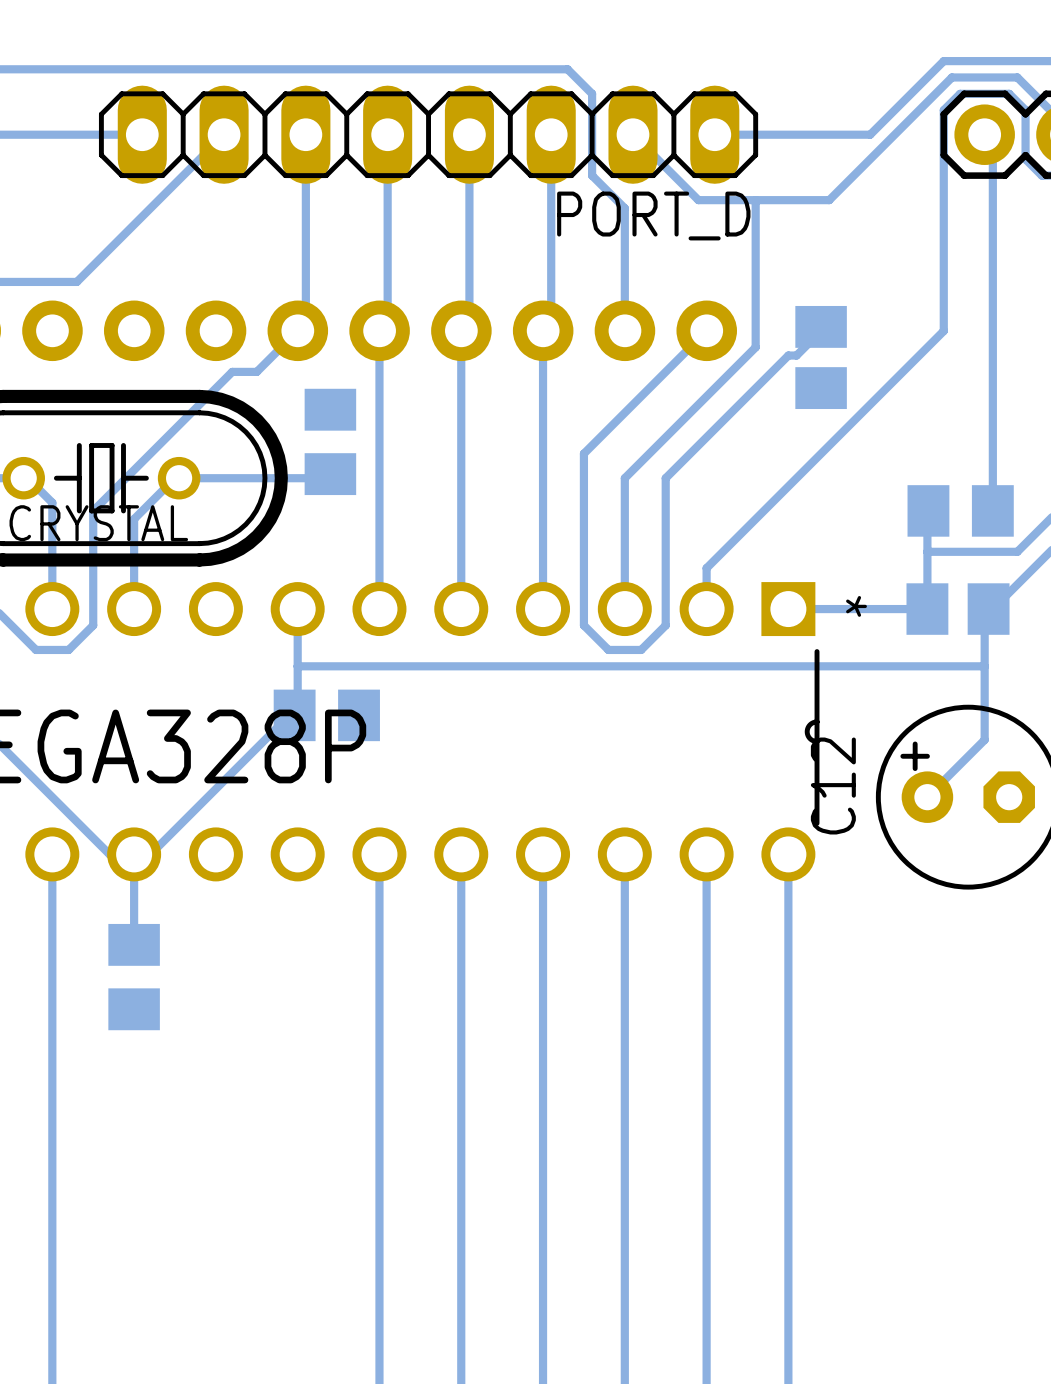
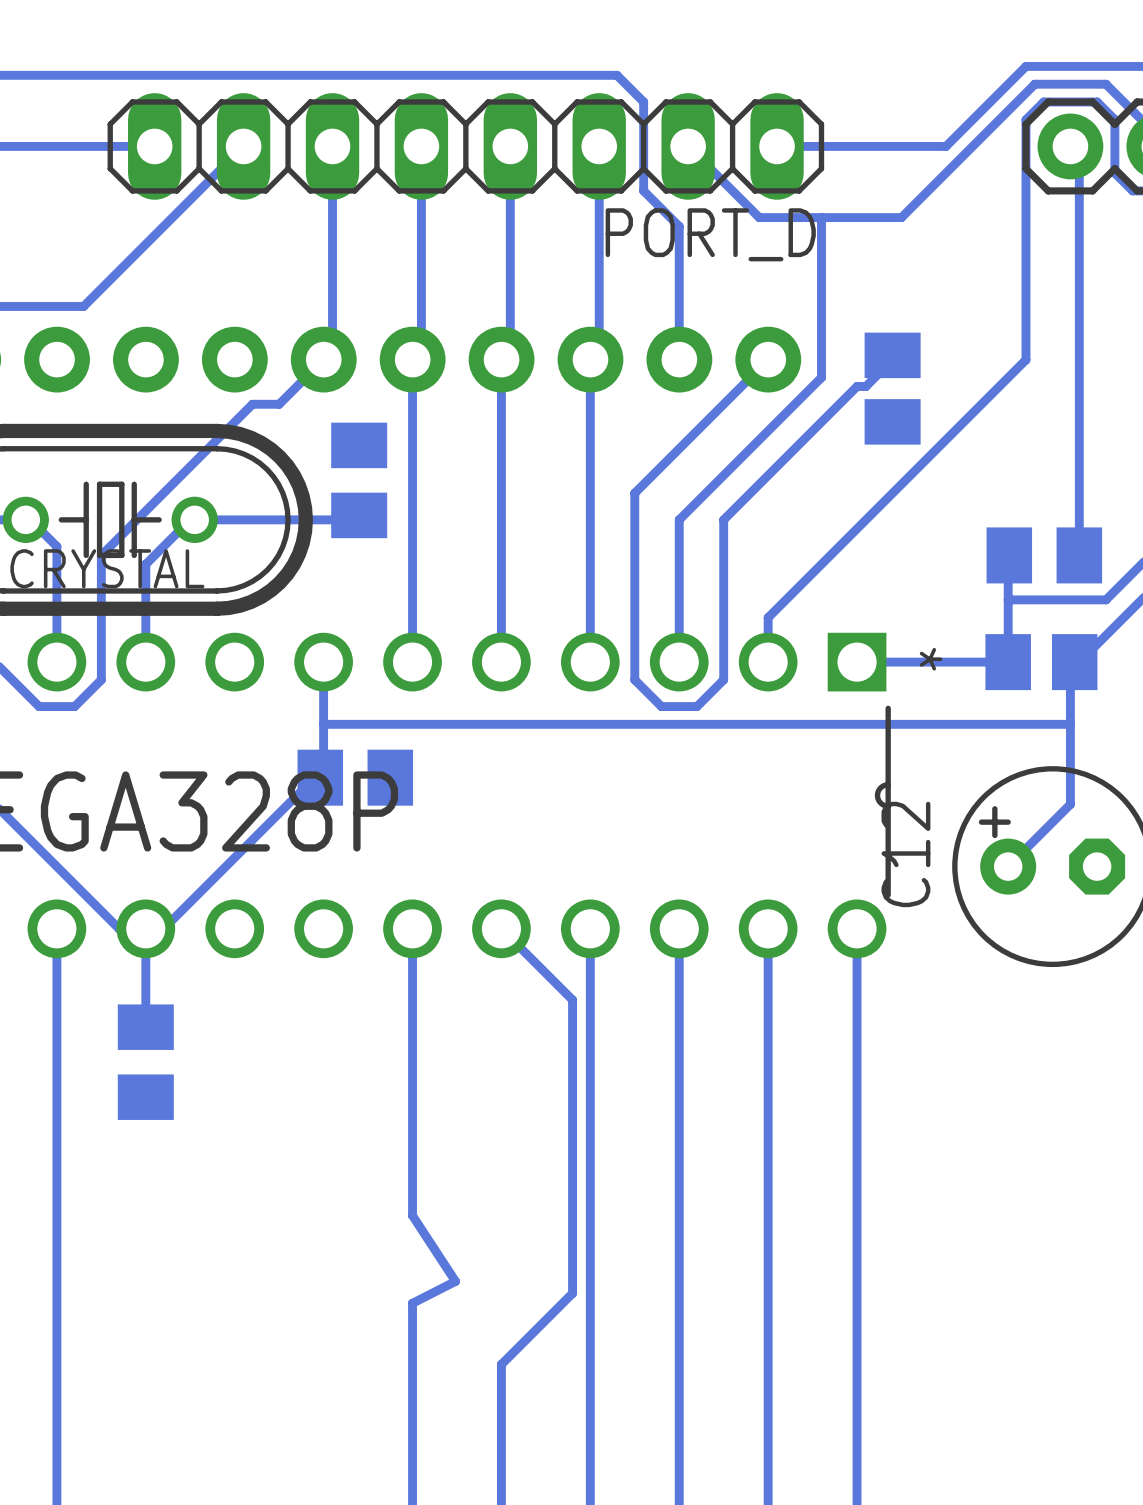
bottom track: (461, 854) (461, 1255) -> (501, 928) (572, 999) (572, 1293) (501, 1364)
bottom track: (379, 1118) (379, 1198) -> (412, 1215) (455, 1281) (412, 1303)

